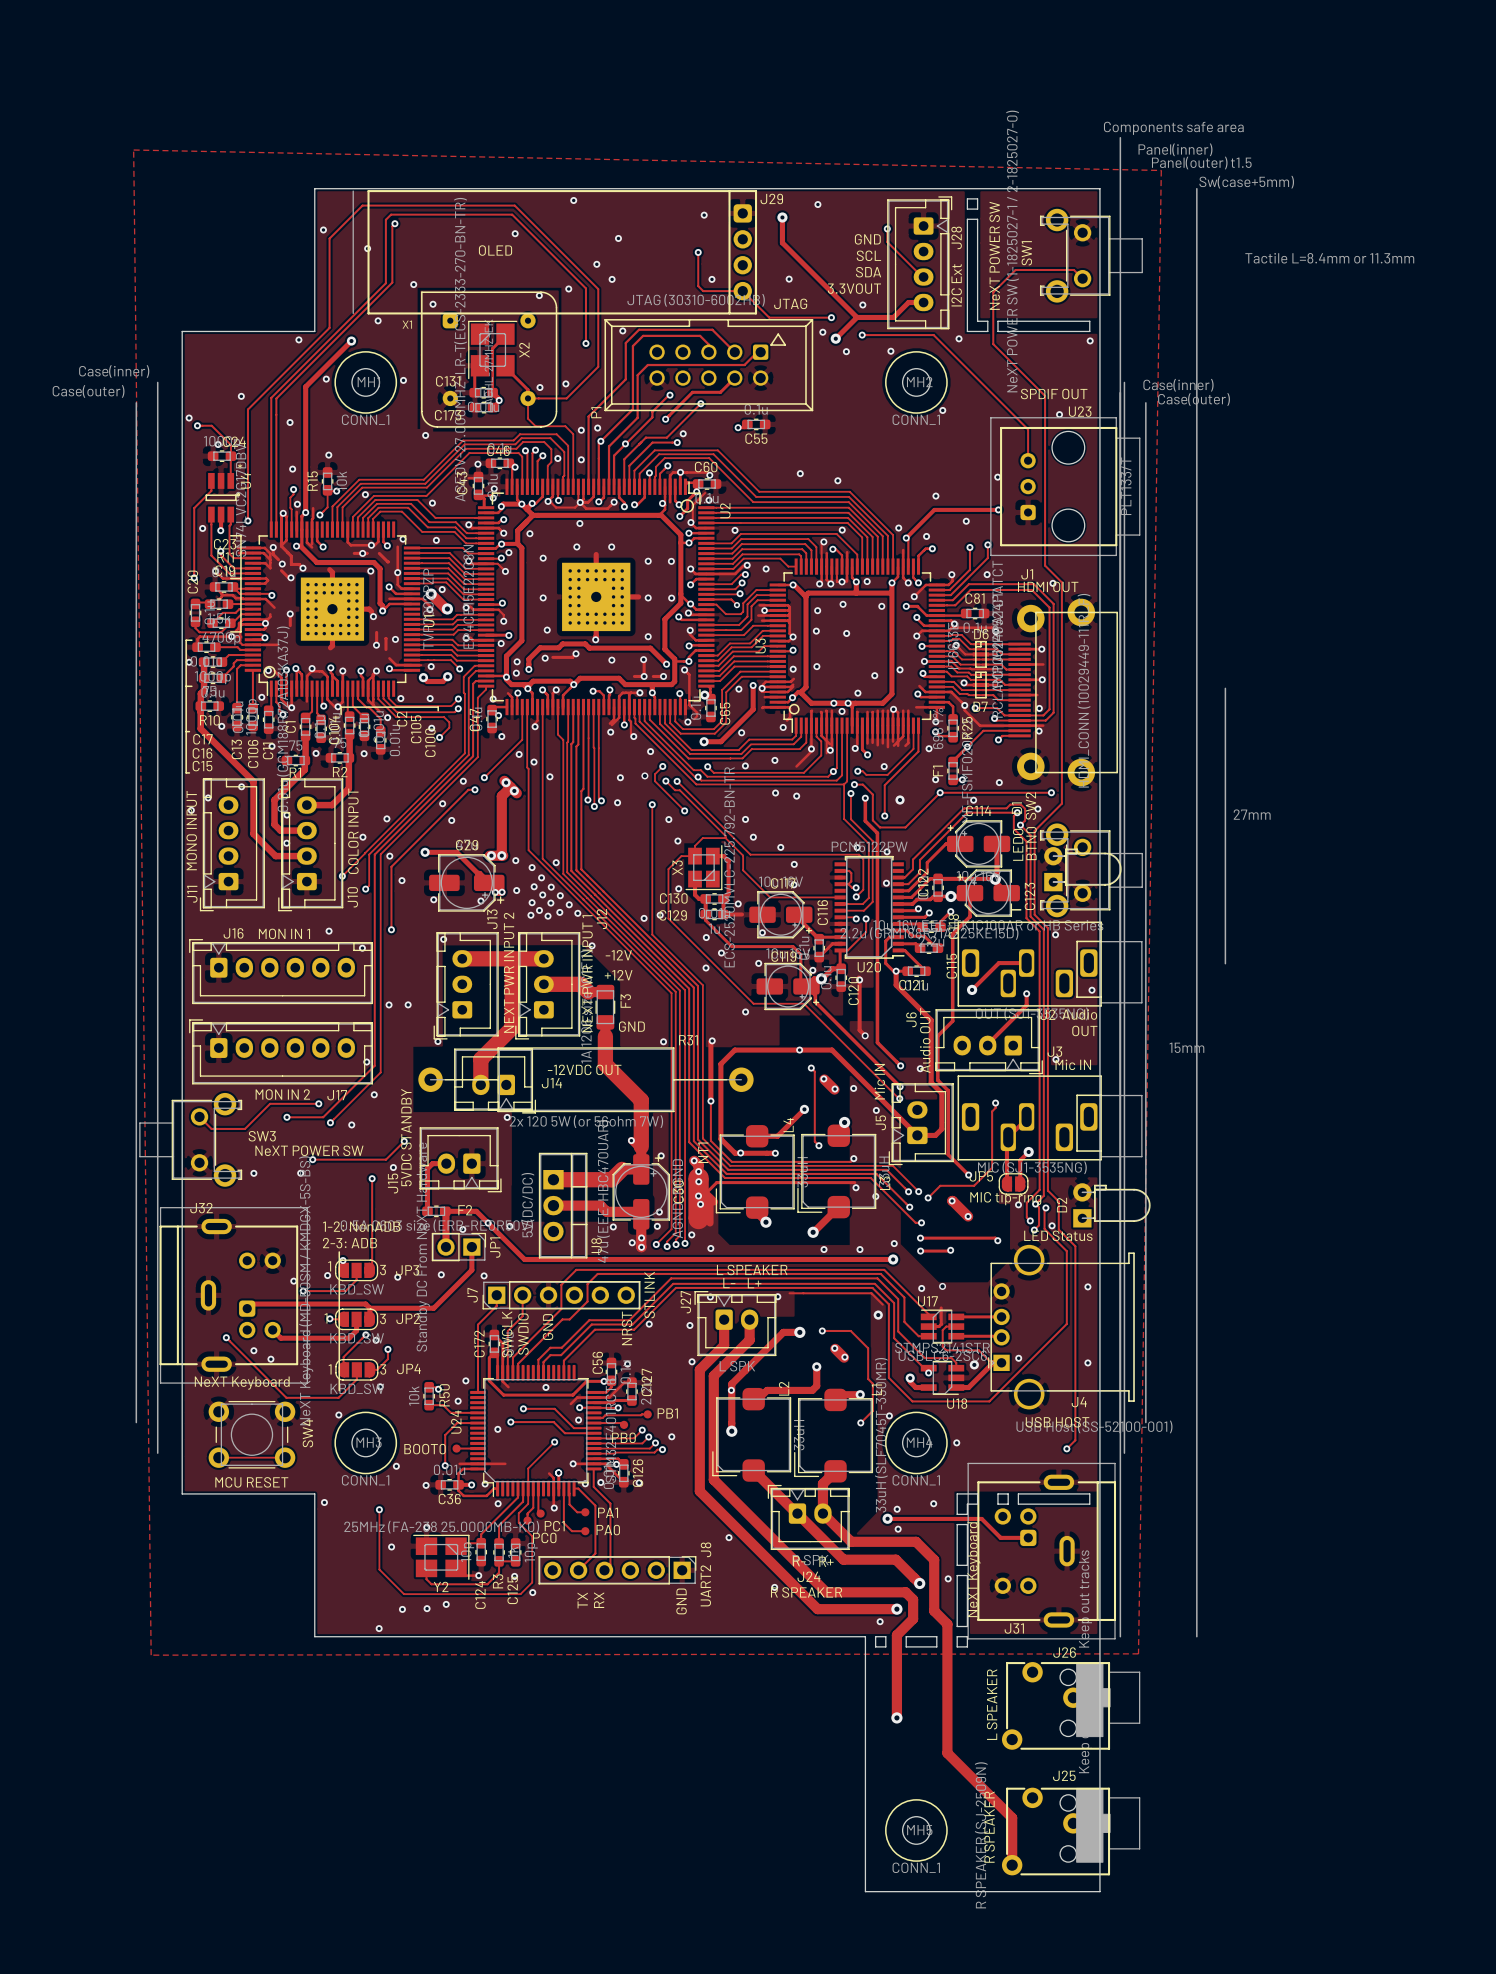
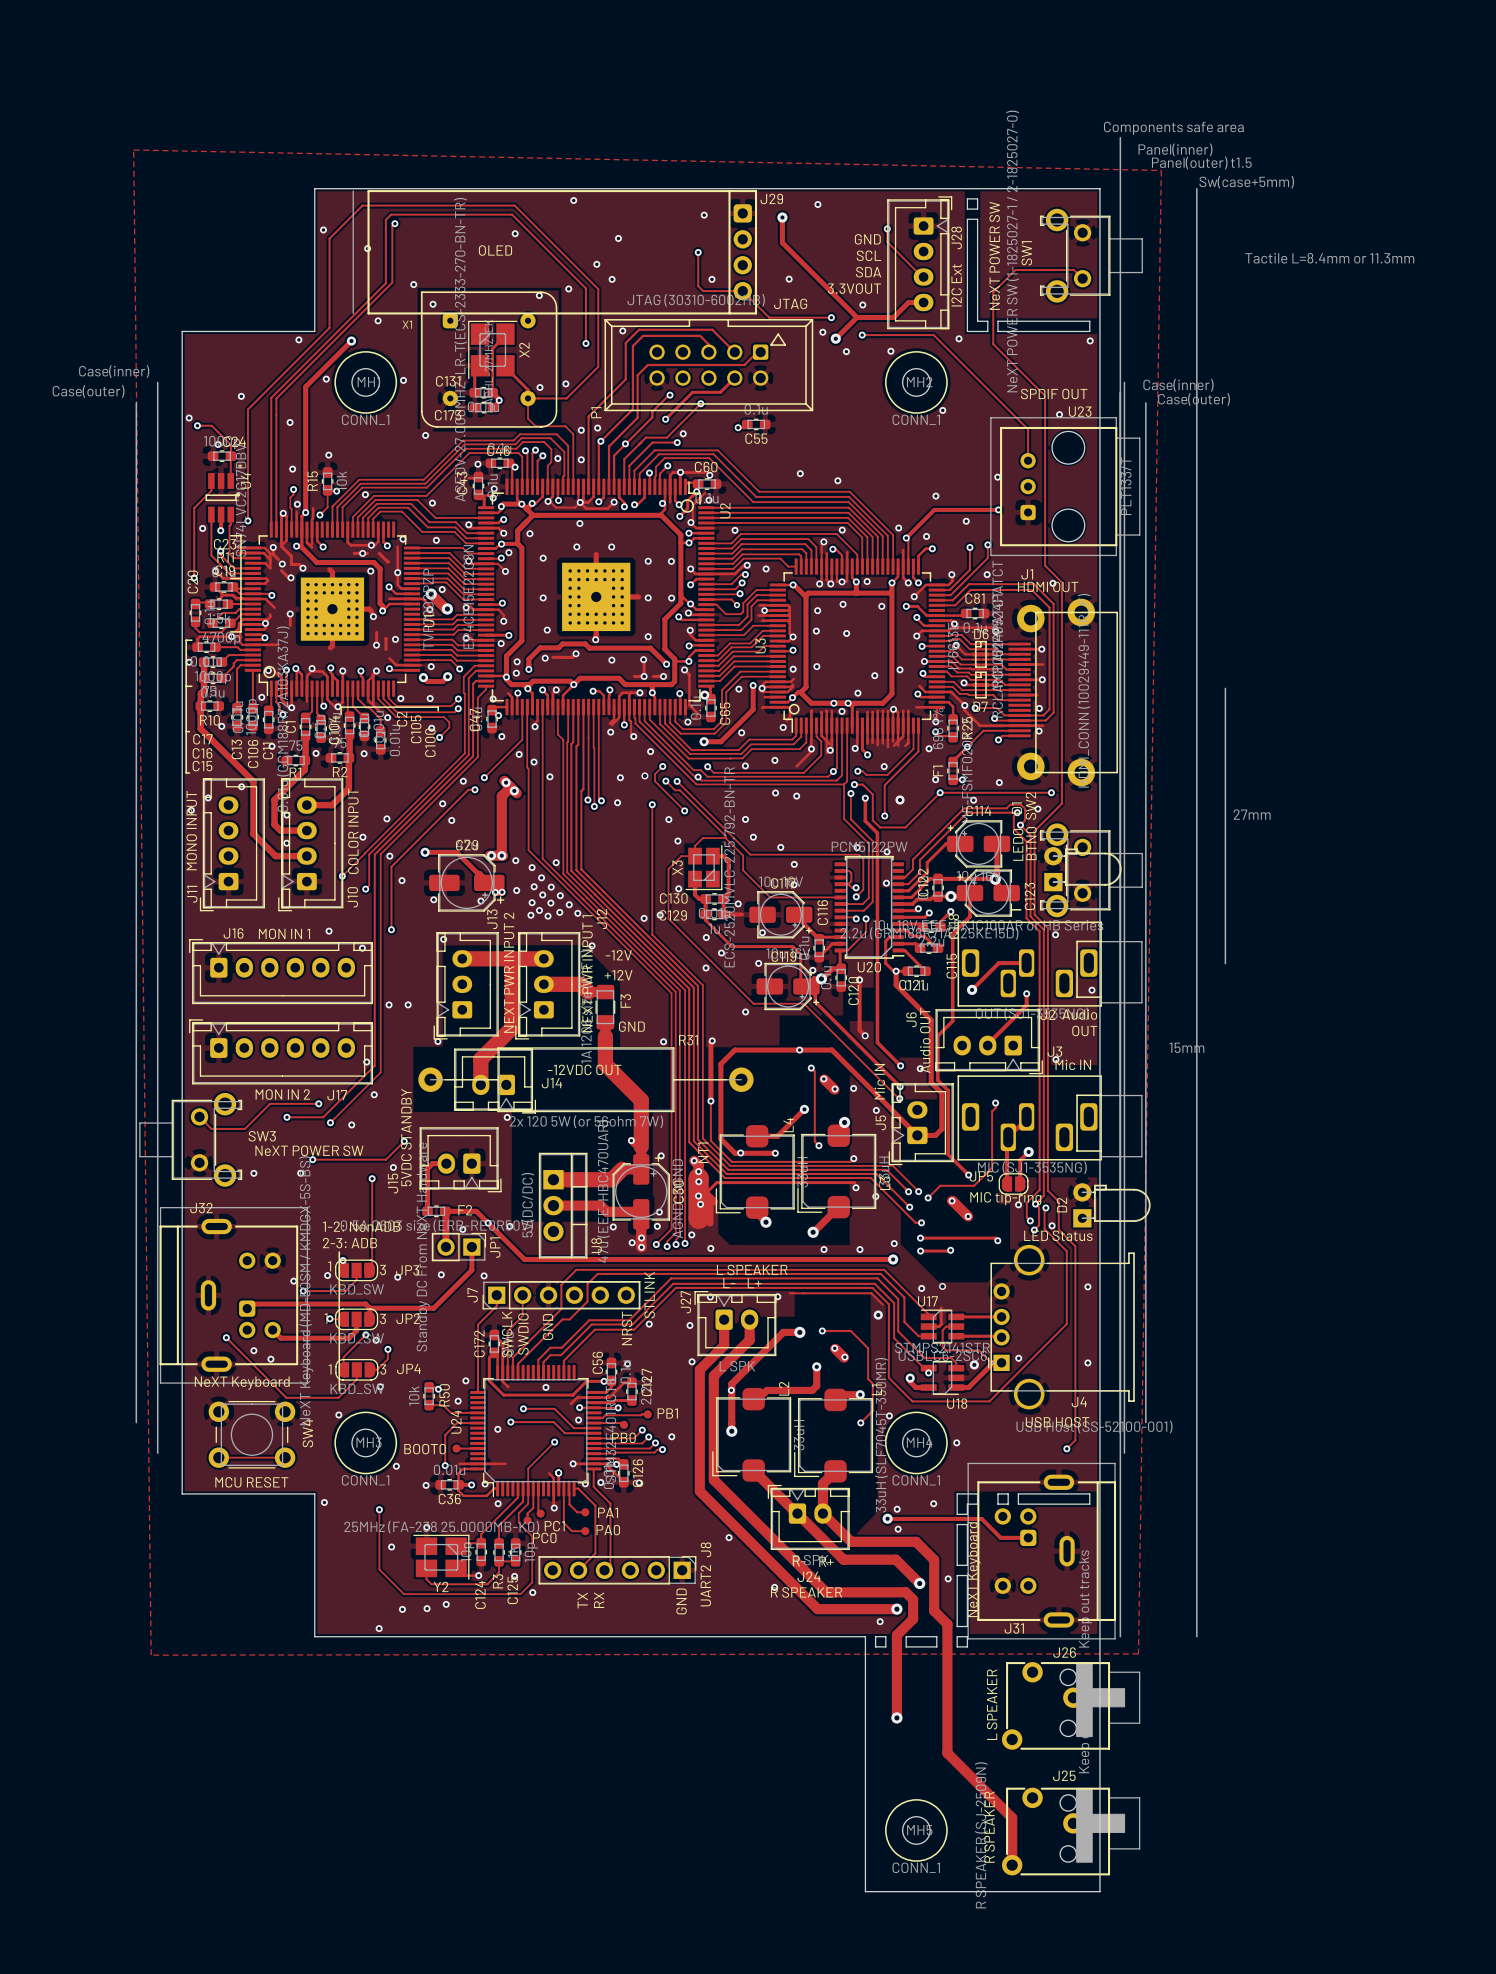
J26 footprint: [1001, 1662, 1141, 1750] -> [1001, 1662, 1141, 1750]
J25 footprint: [1001, 1787, 1141, 1876] -> [1001, 1787, 1141, 1876]

